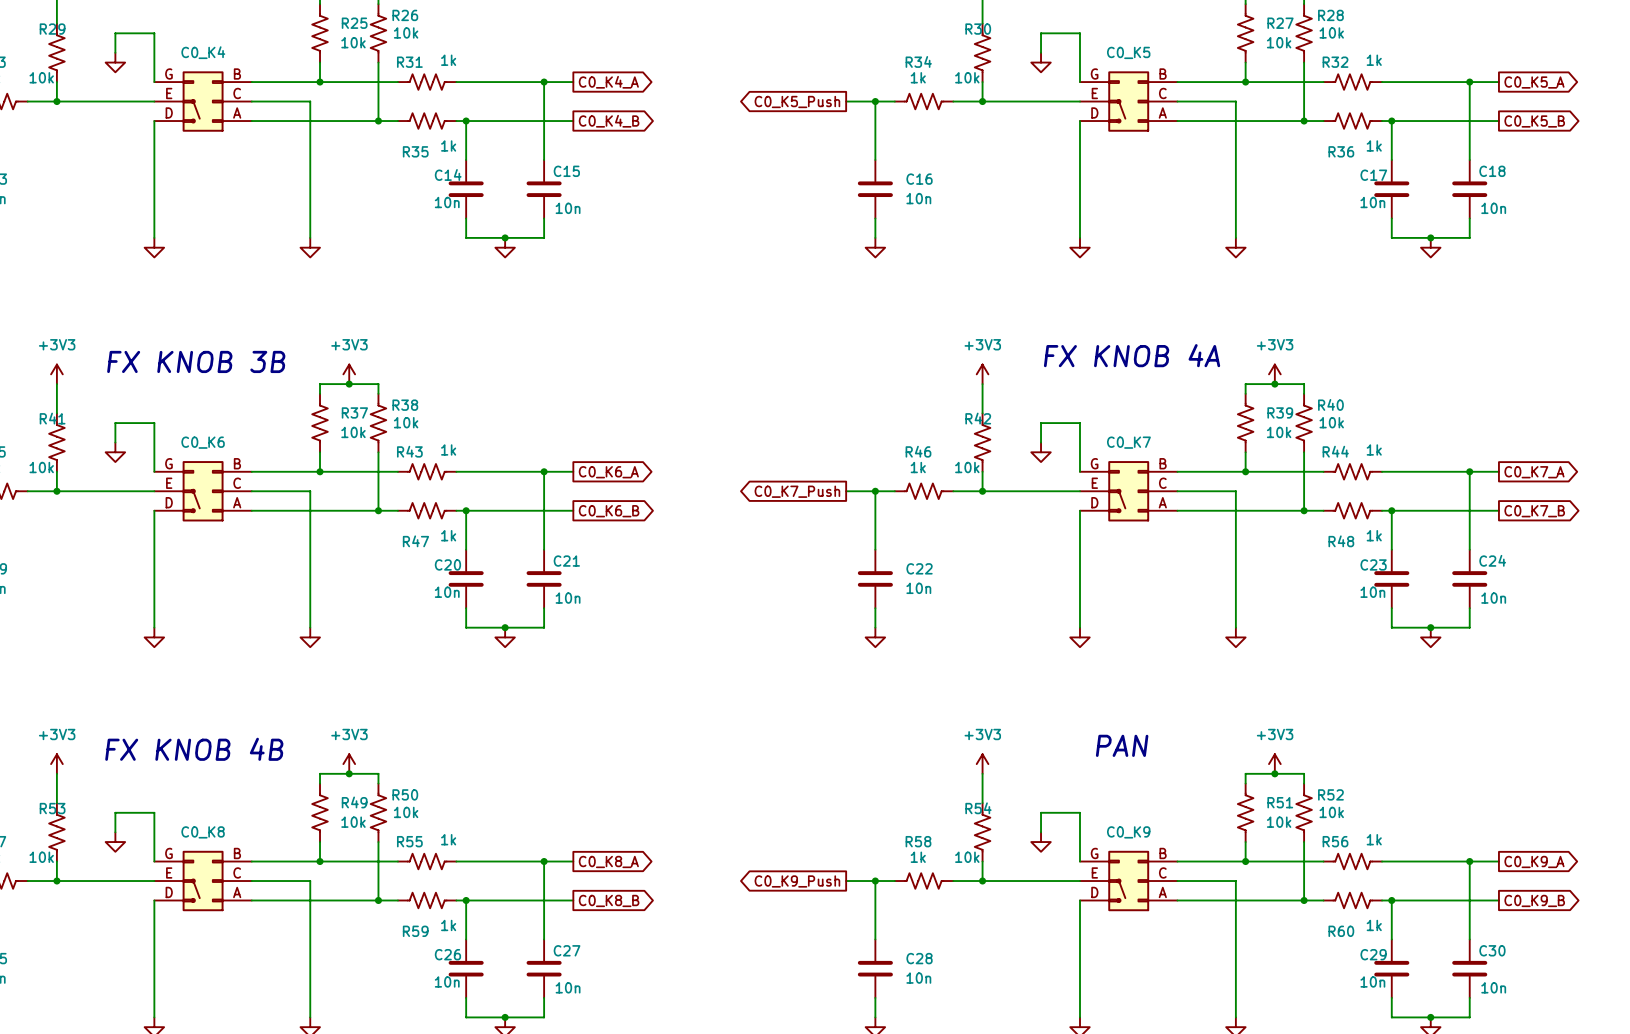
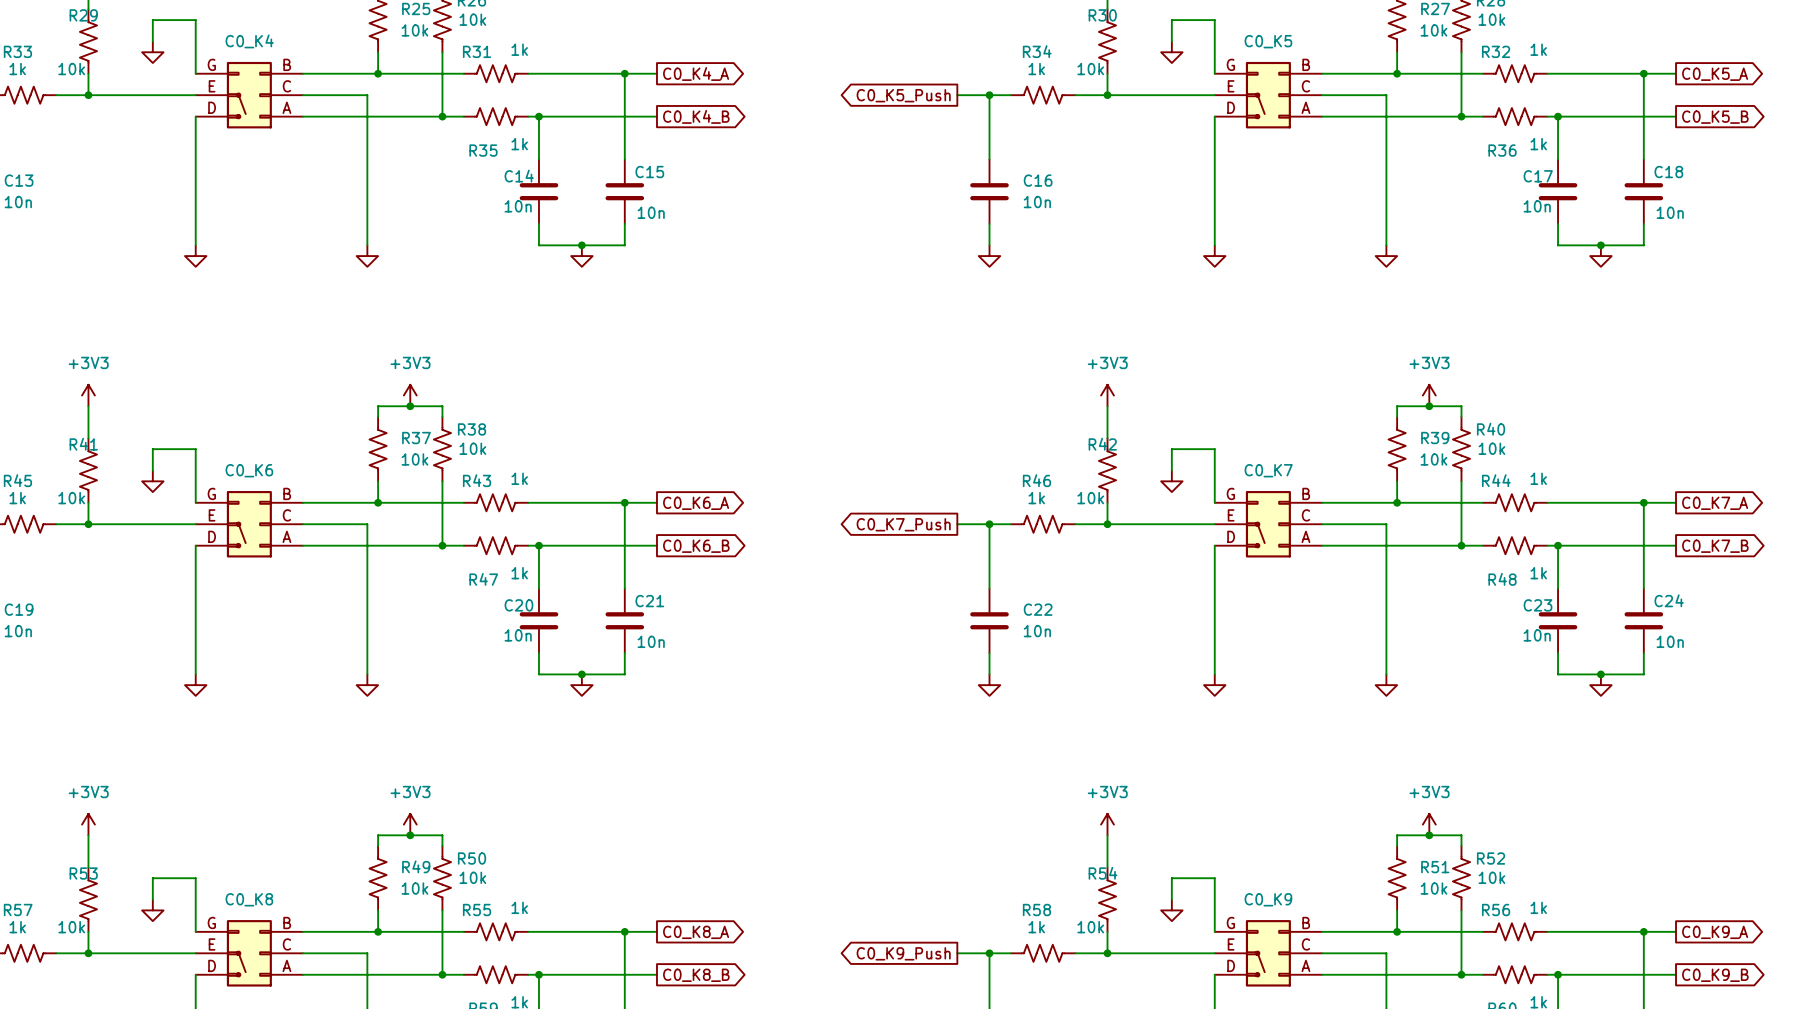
text: FX KNOB 4A (1132, 355) -> none
text: FX KNOB 3B (196, 361) -> none
text: PAN (1122, 745) -> none
text: FX KNOB 4B (194, 749) -> none

